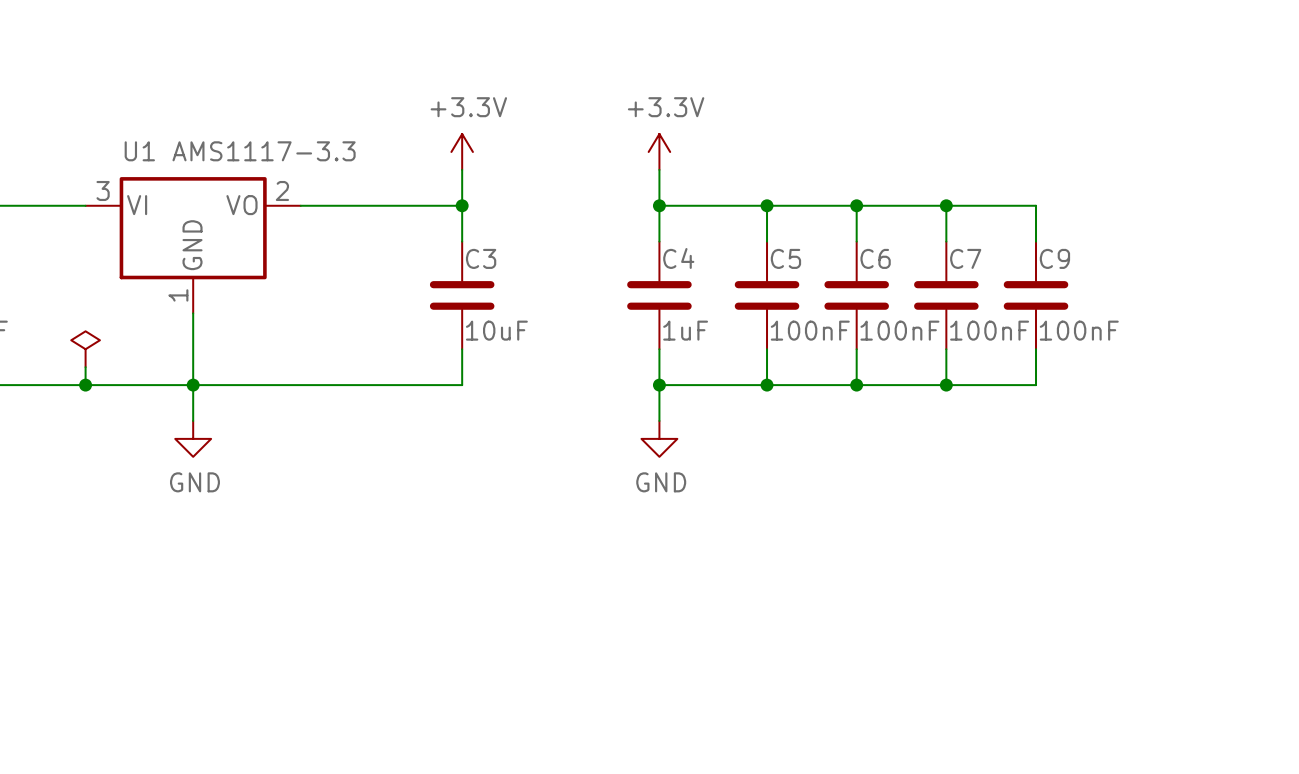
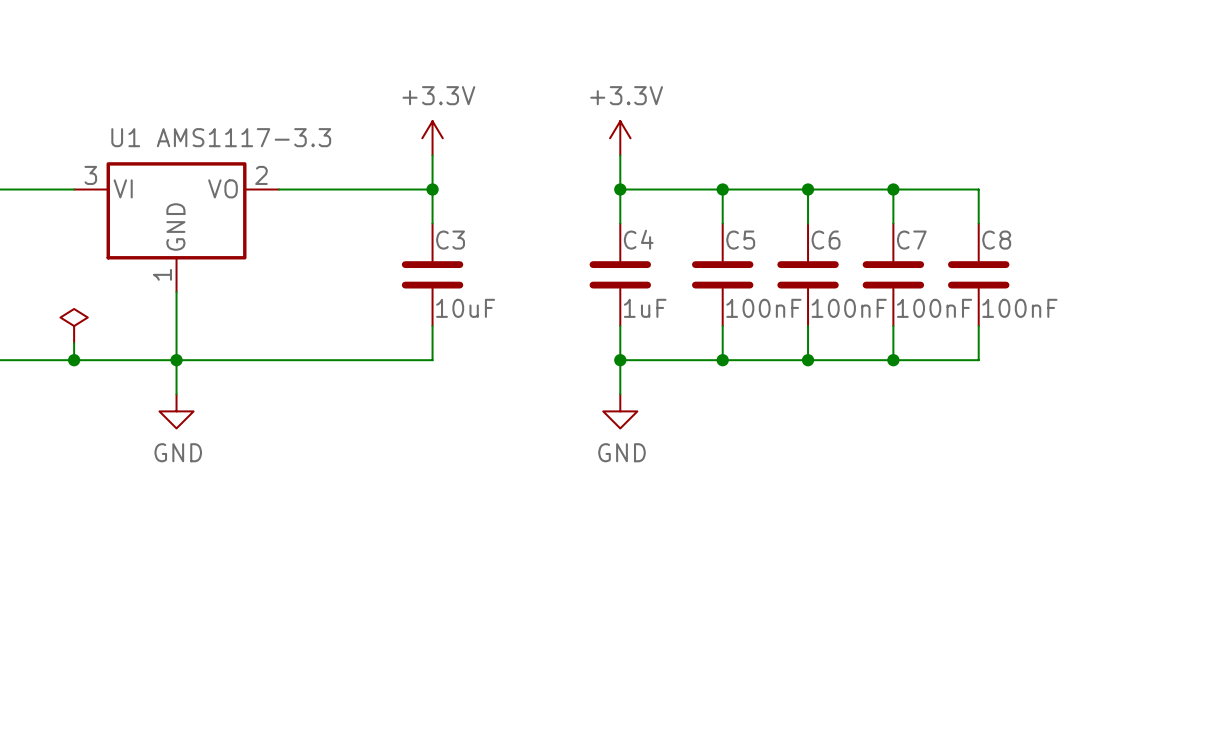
C9 name: C9 (1054, 258) -> C8 (996, 240)

